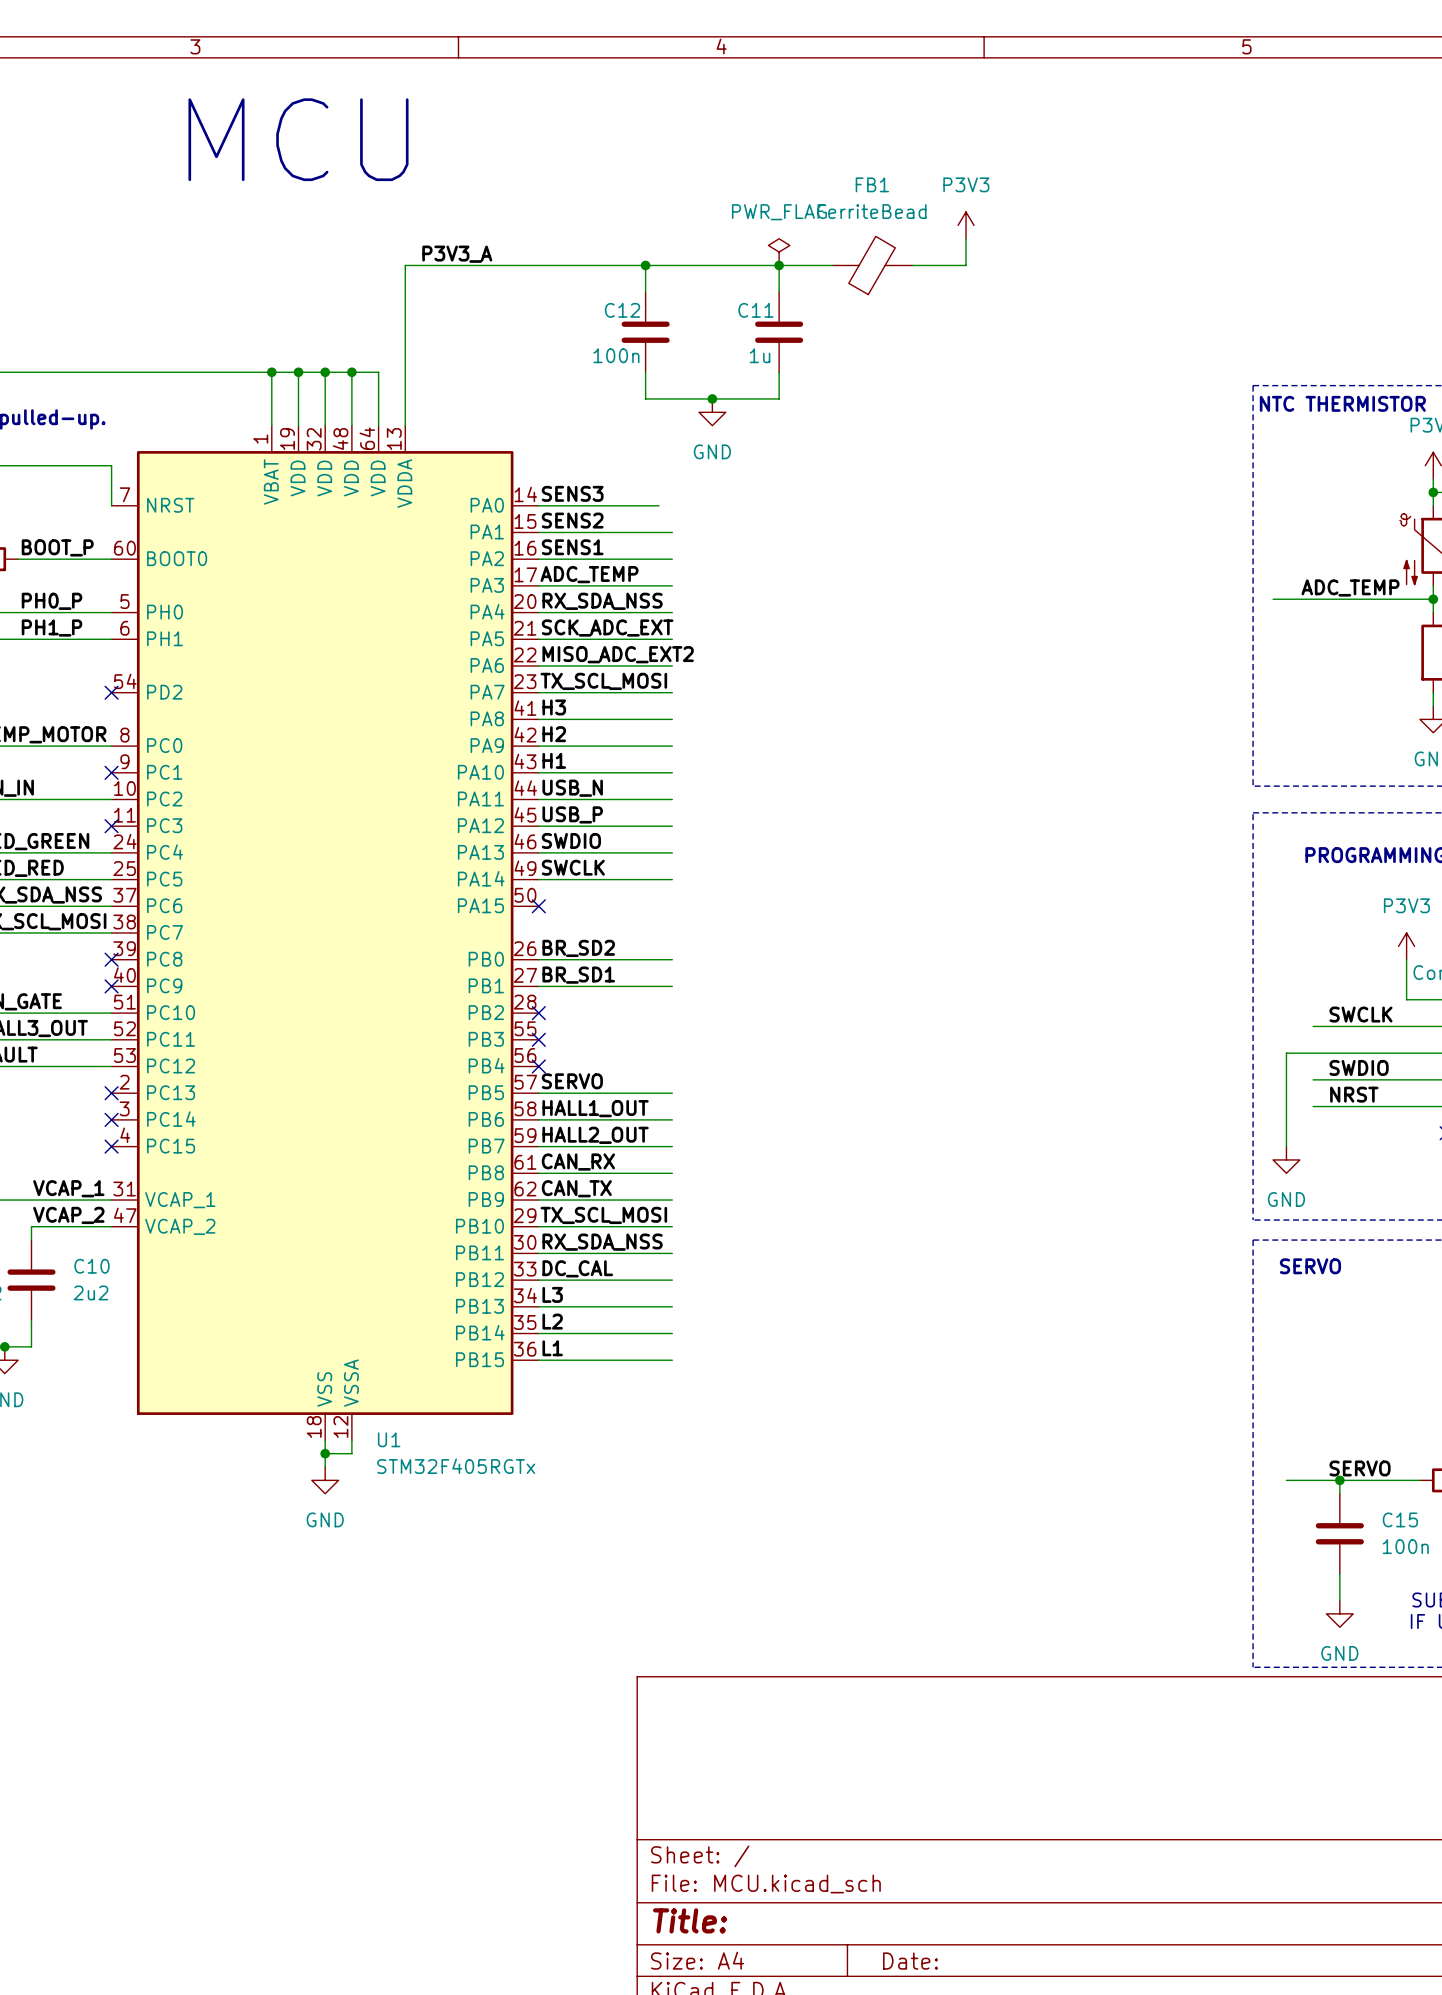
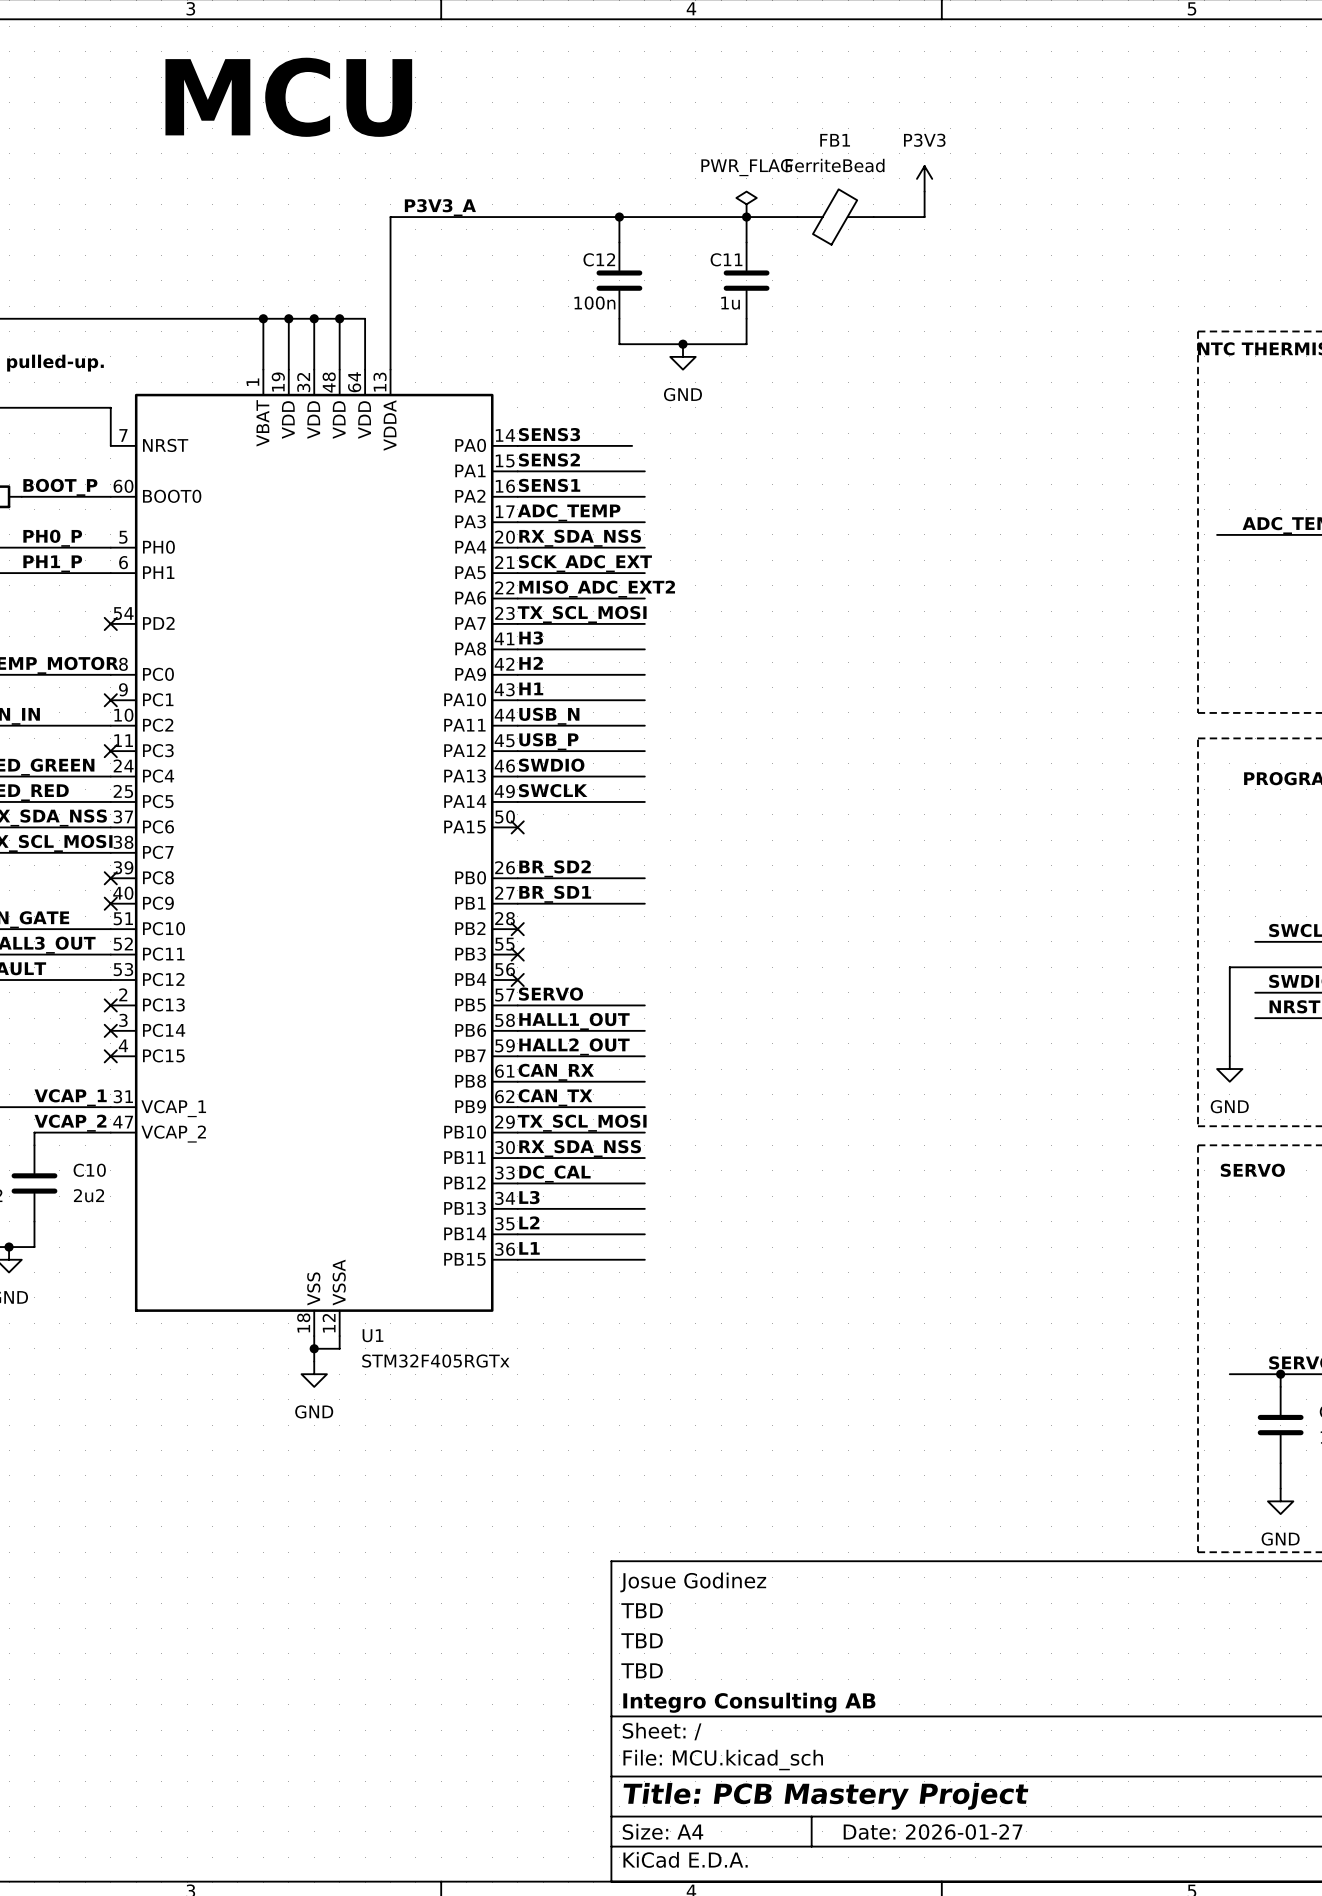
title block: none -> Josue Godinez (693, 1582)
title block: none -> TBD (642, 1610)
title block: none -> TBD (642, 1640)
title block: none -> TBD (642, 1670)
title block: none -> Integro Consulting AB (749, 1702)
title block: Title: (690, 1920) -> Title: PCB Mastery Project (825, 1796)
title block: Date: (910, 1961) -> Date: 2026-01-27 (933, 1832)

